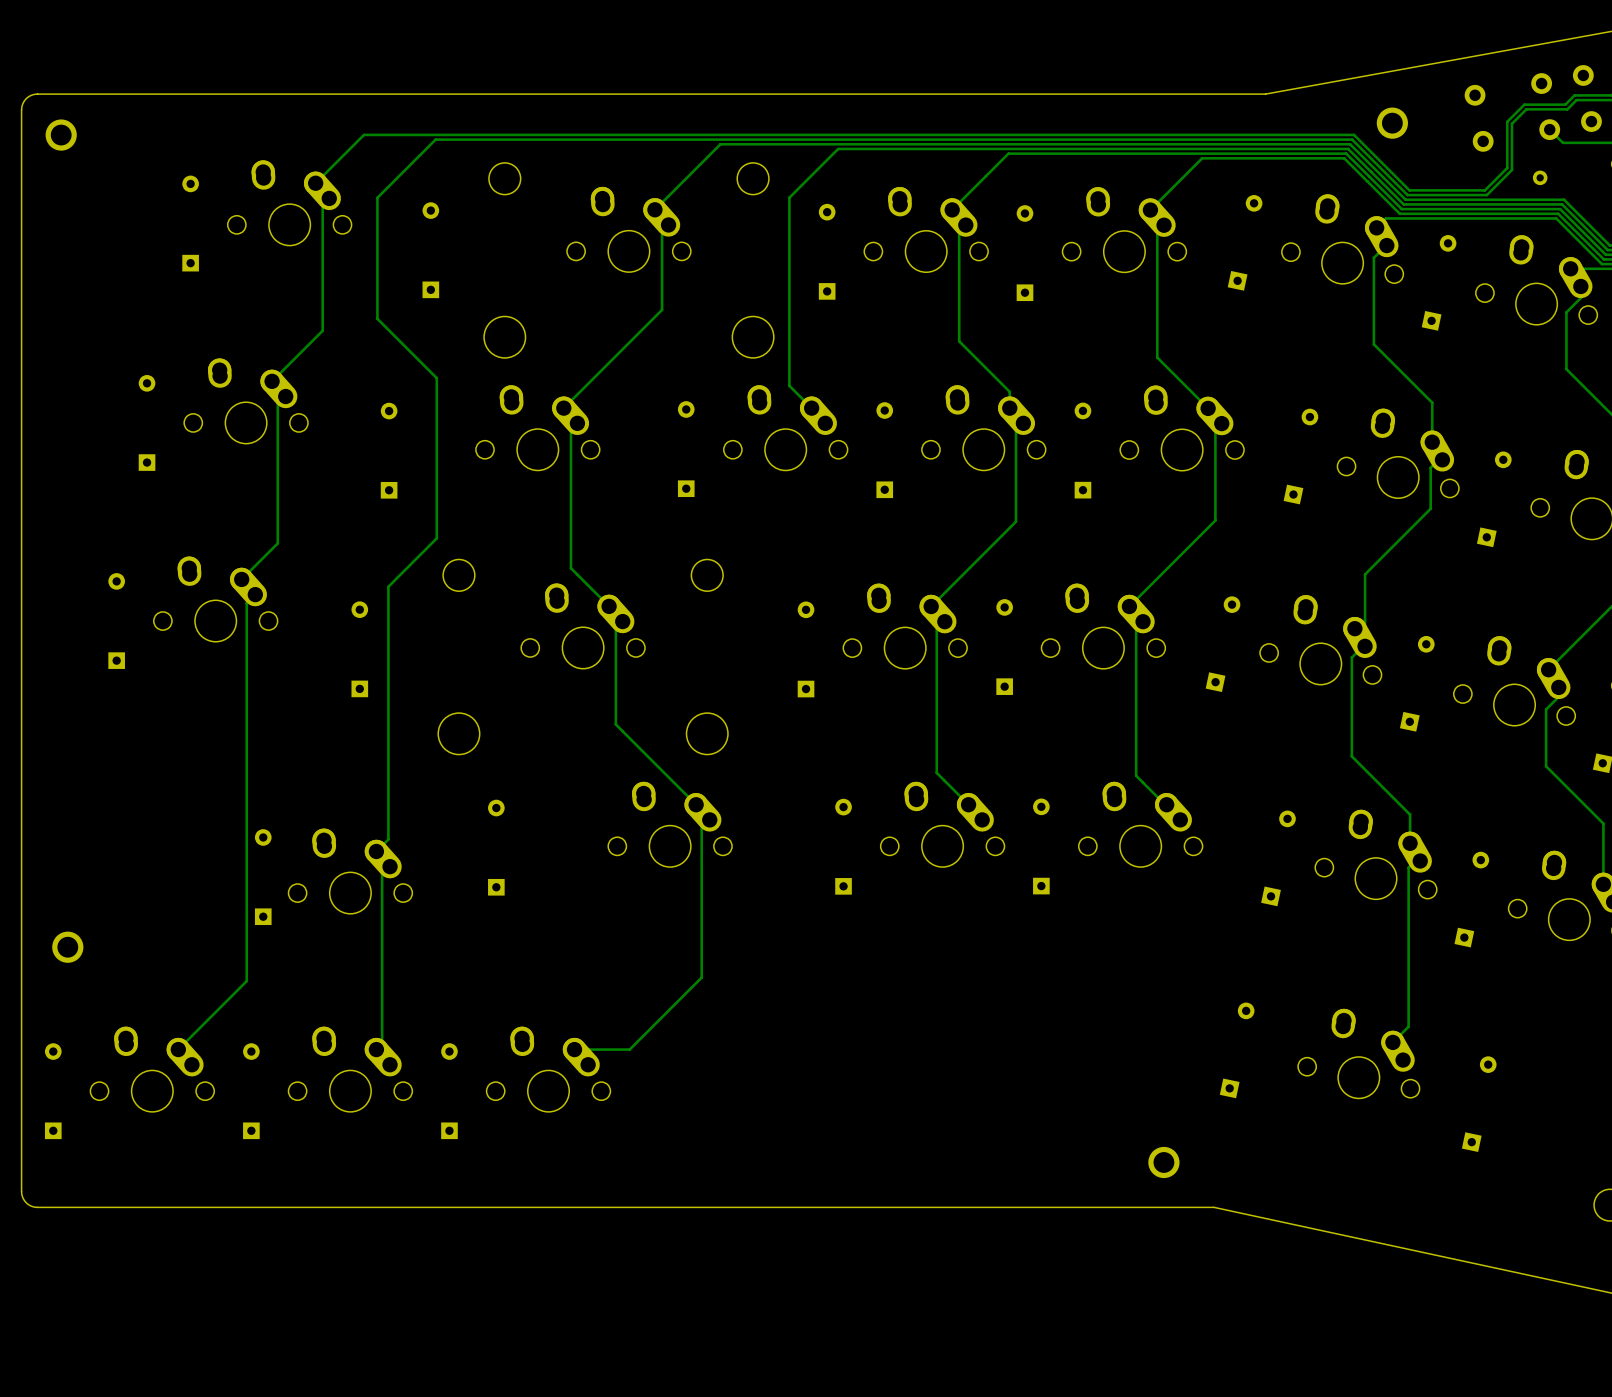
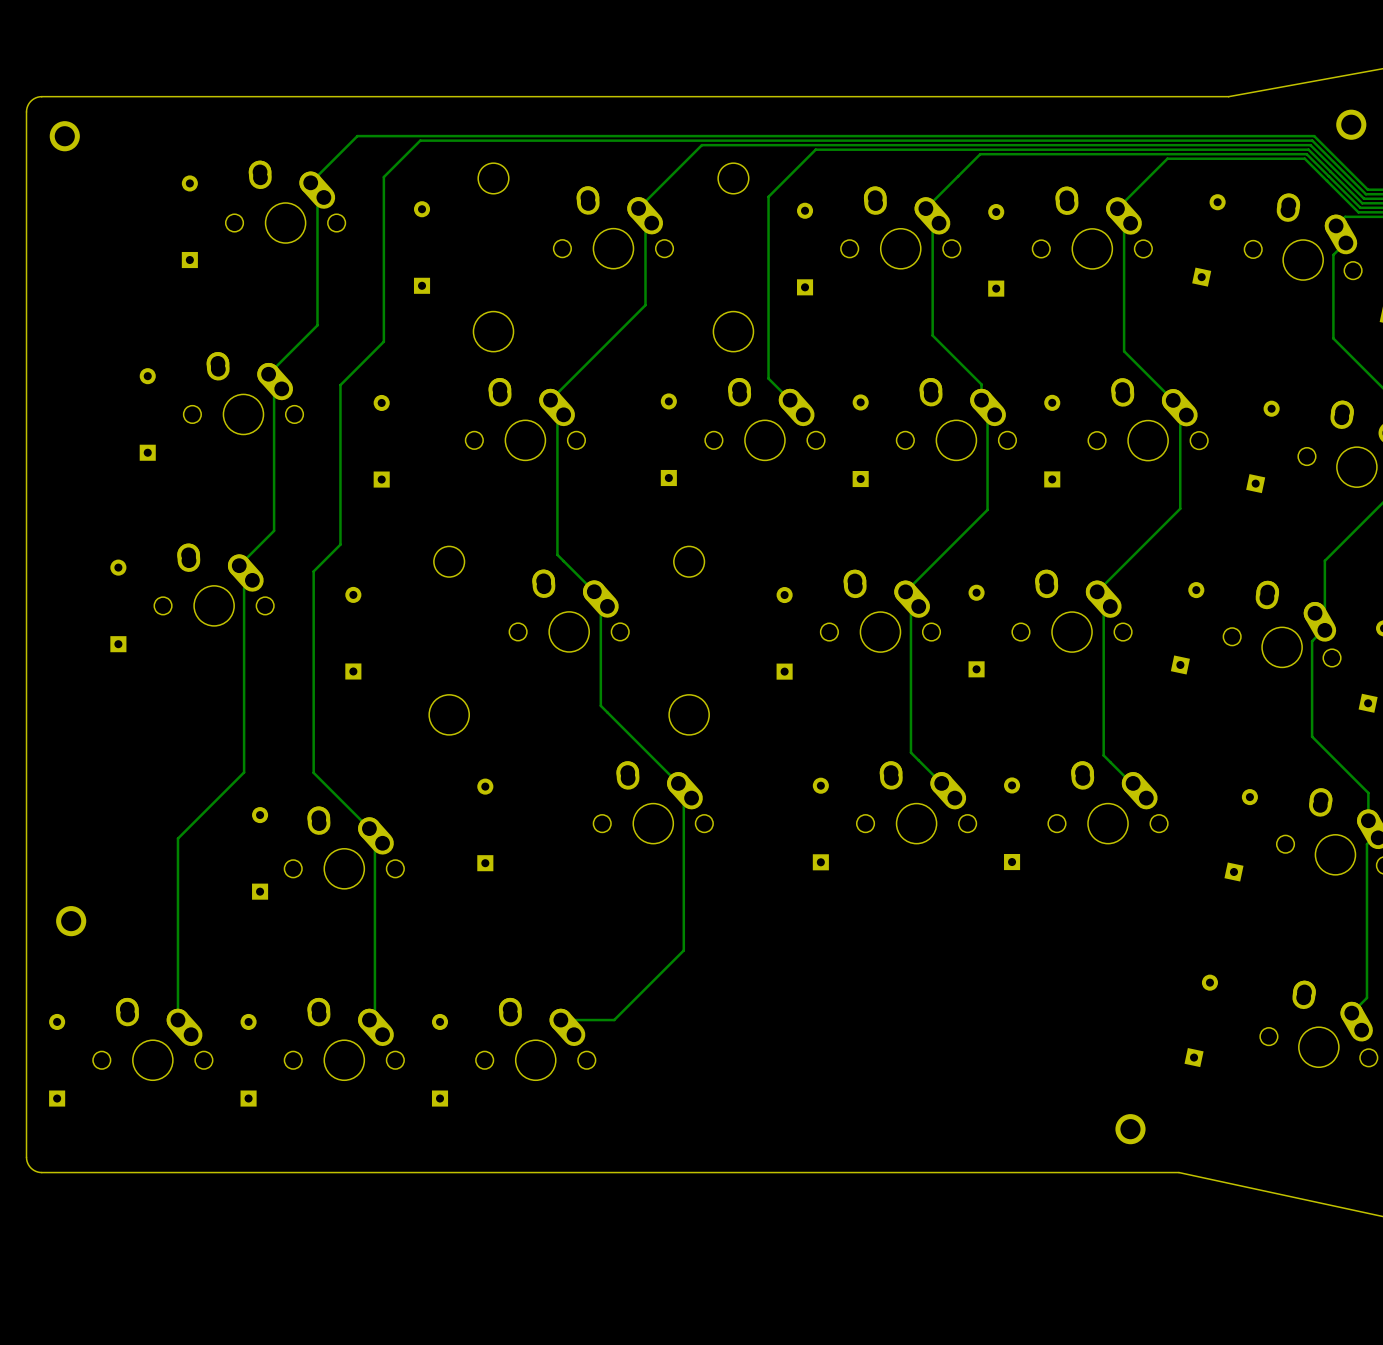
track: (435, 139) (377, 197) (377, 318) (436, 378) (436, 538) (388, 586) (388, 839) (376, 851) -> (426, 140) (420, 140) (383, 177) (383, 341) (340, 385) (340, 544) (313, 571) (313, 772) (369, 828)
track: (246, 793) (246, 981) (178, 1049) -> (244, 772) (177, 838) (177, 1020)

